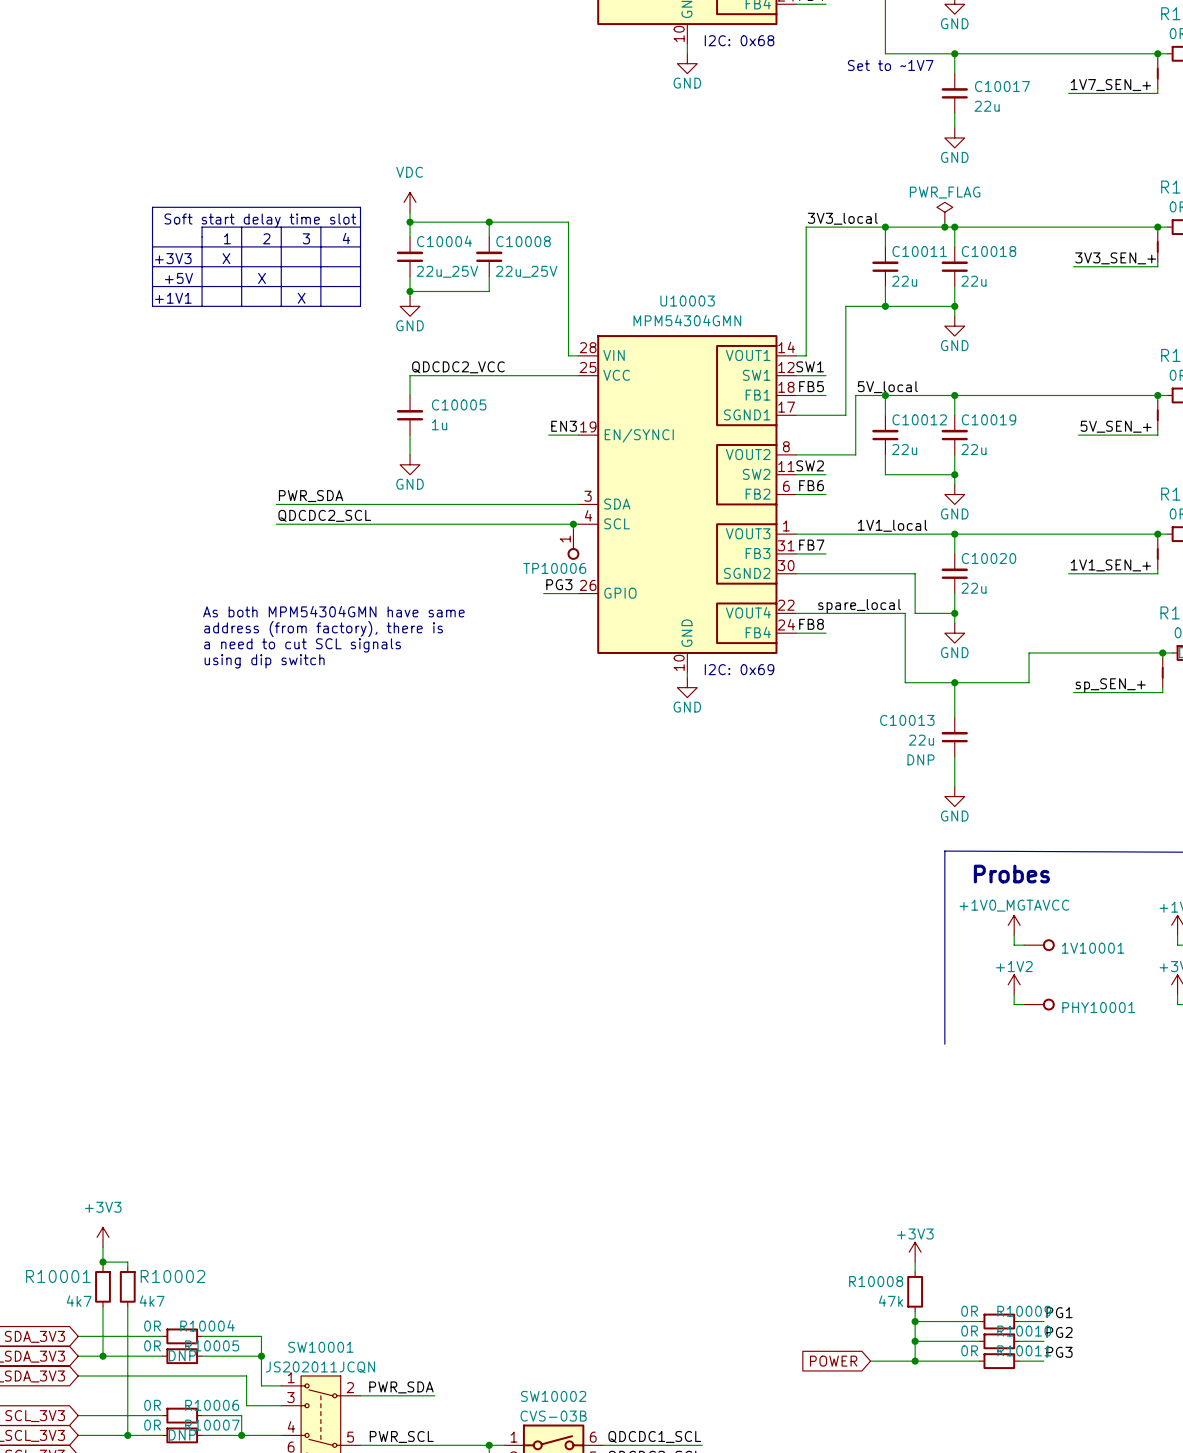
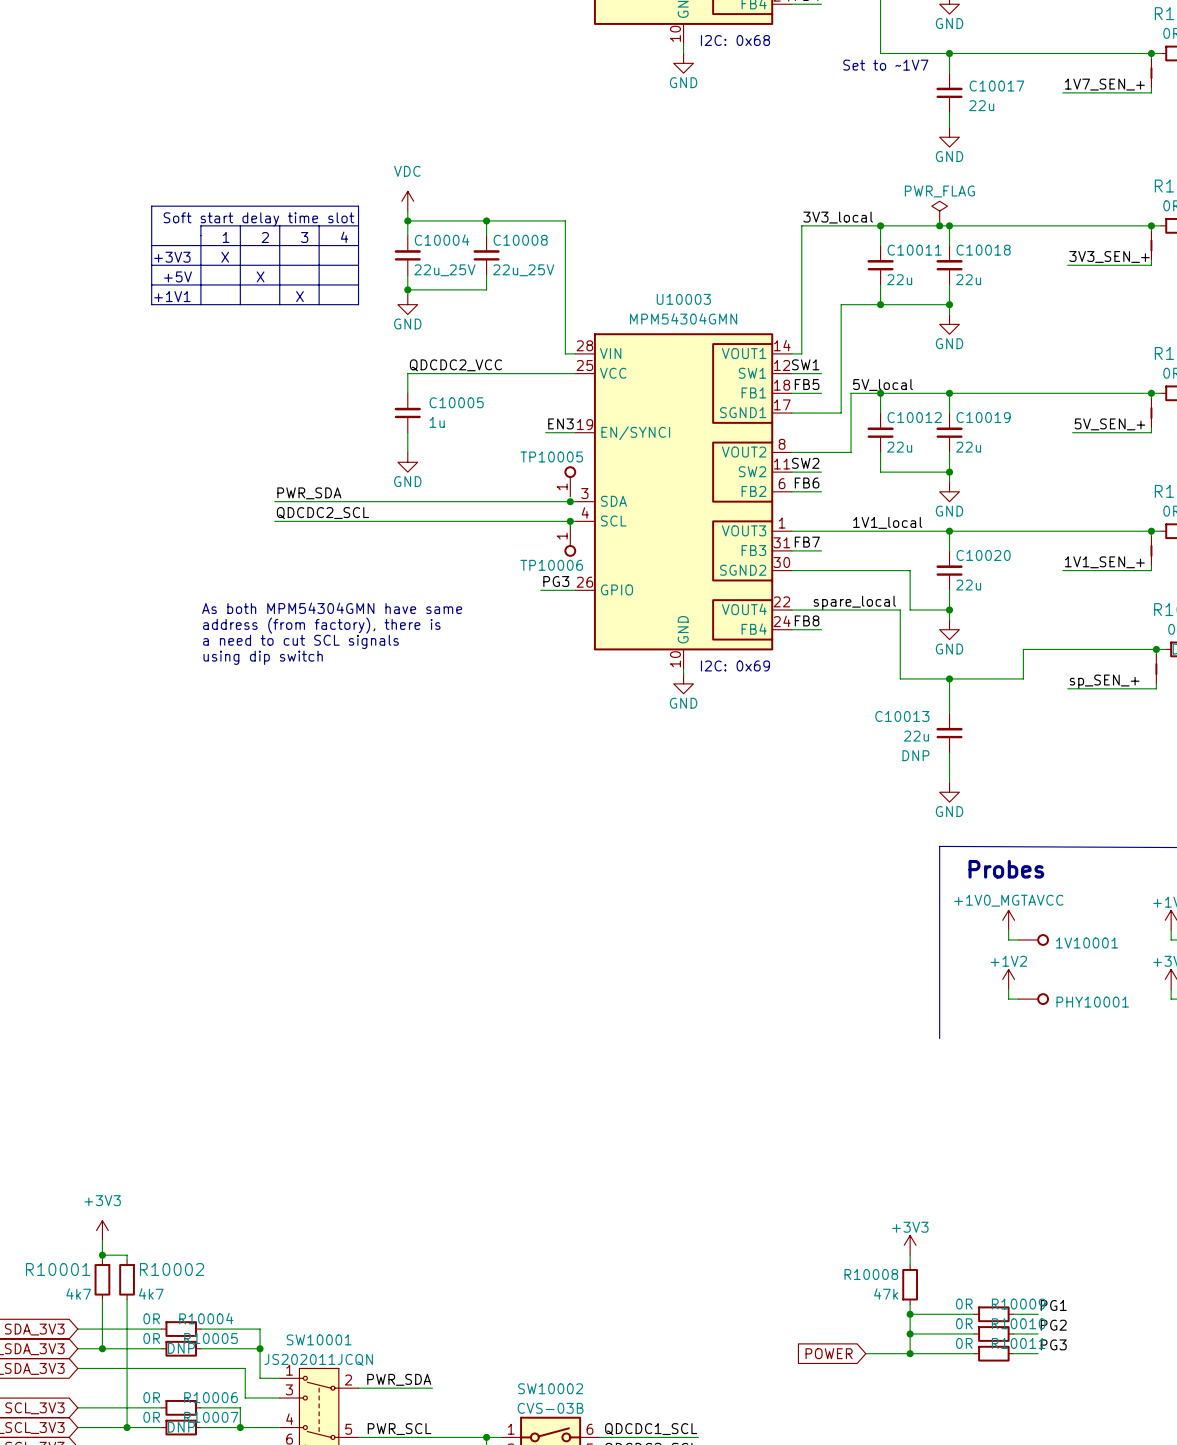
TP10005: none -> (570, 481)
junction: none -> (570, 501)

